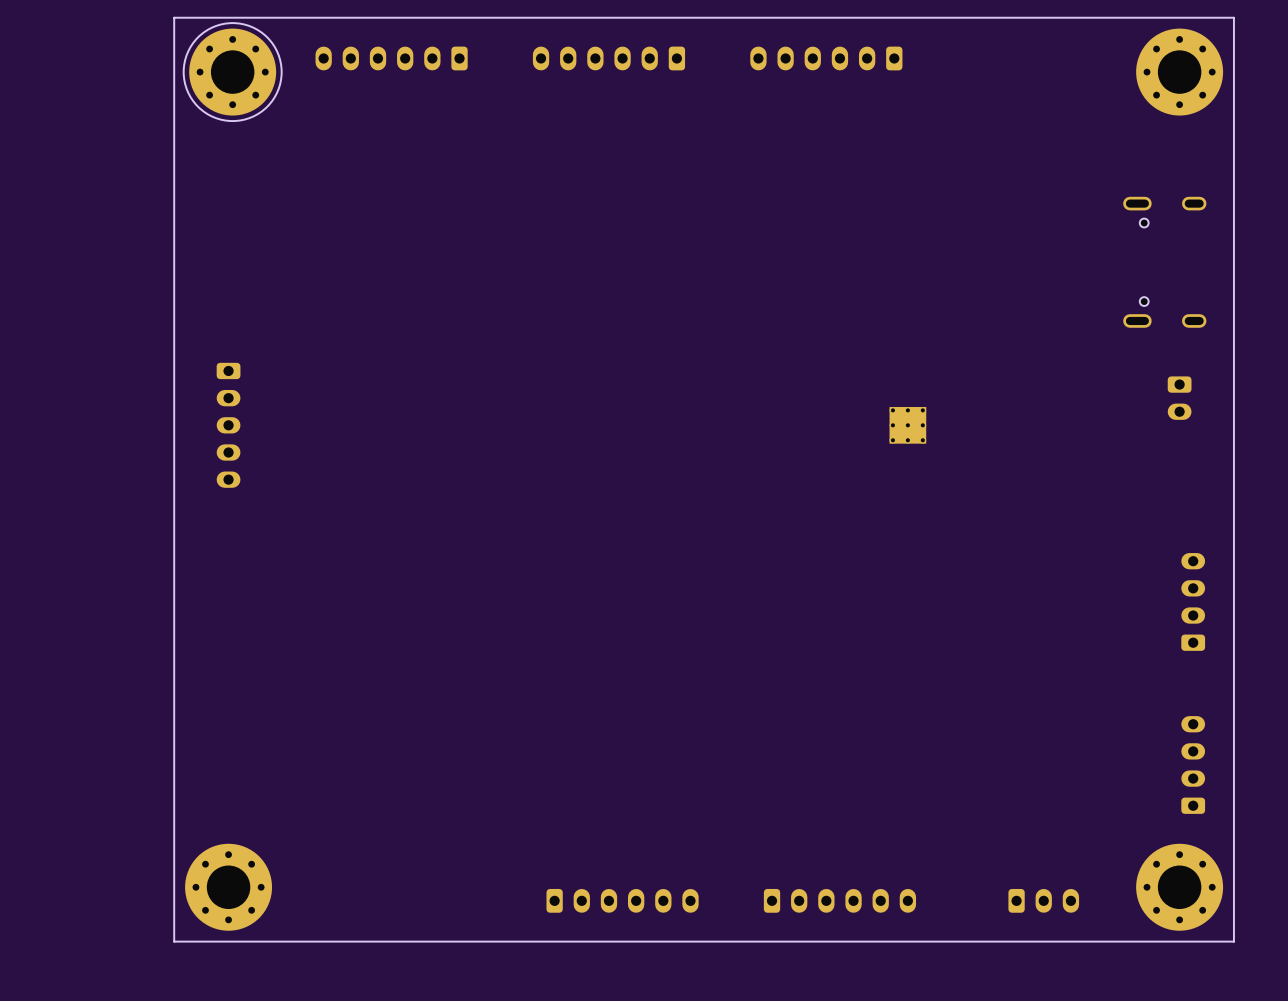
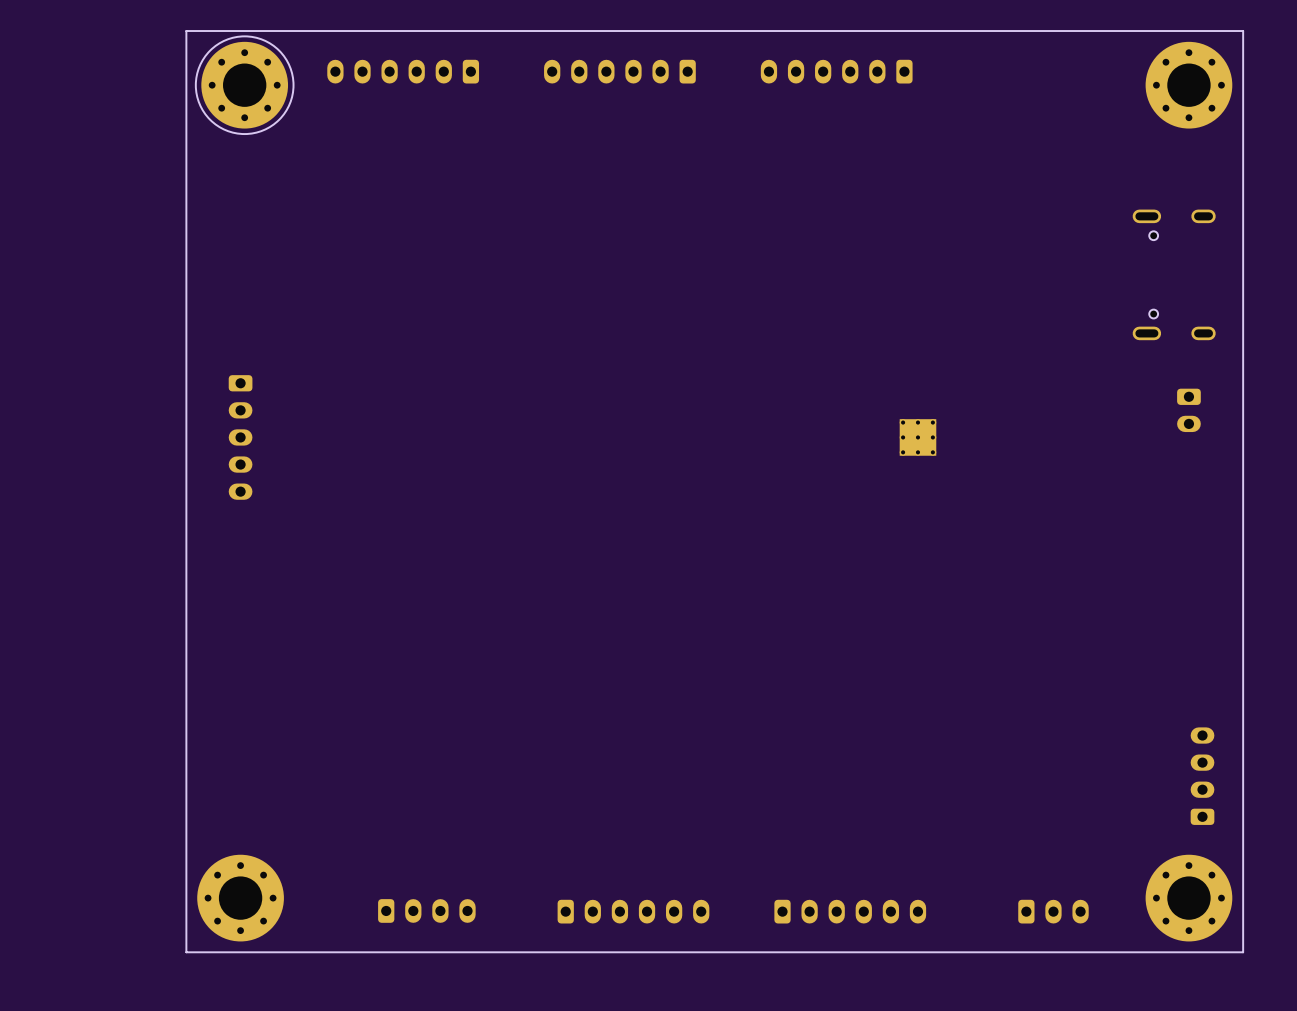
part: (1193, 601) -> none
part: none -> (426, 910)

